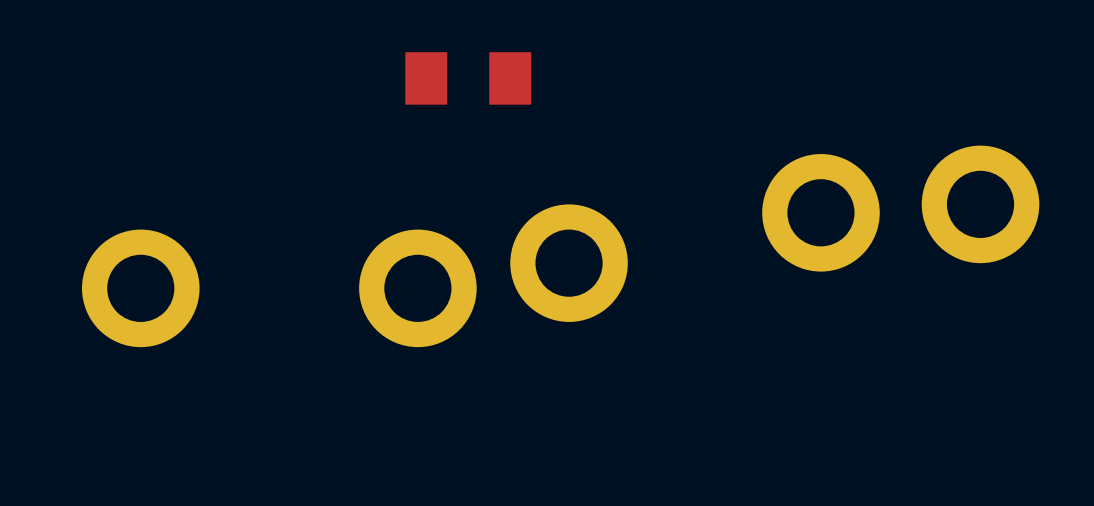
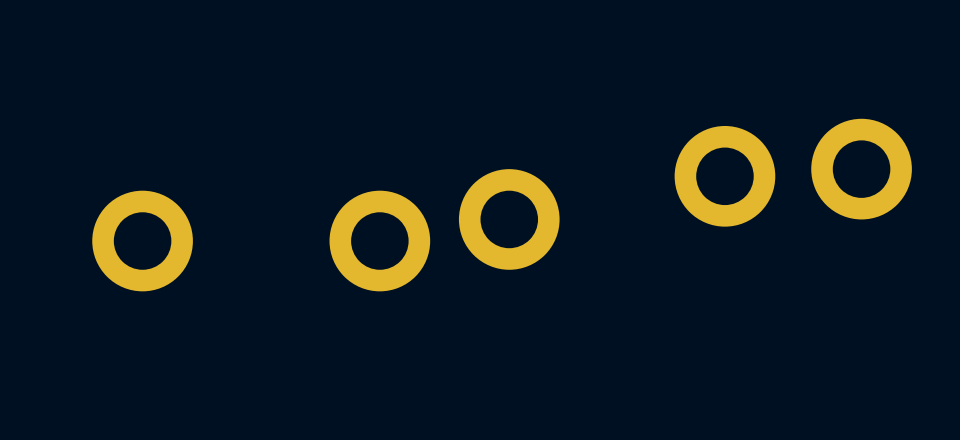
part: (468, 78) -> none

